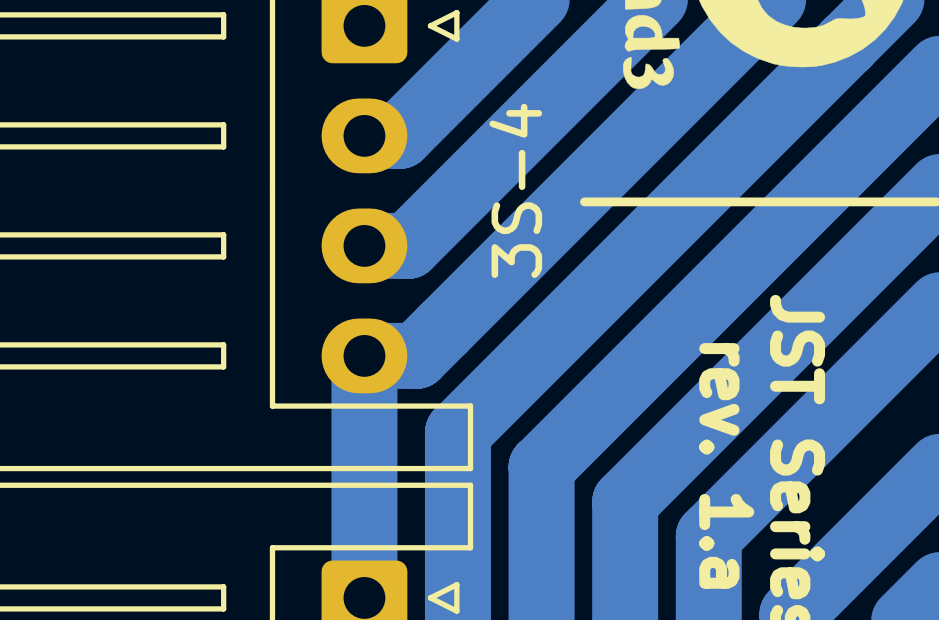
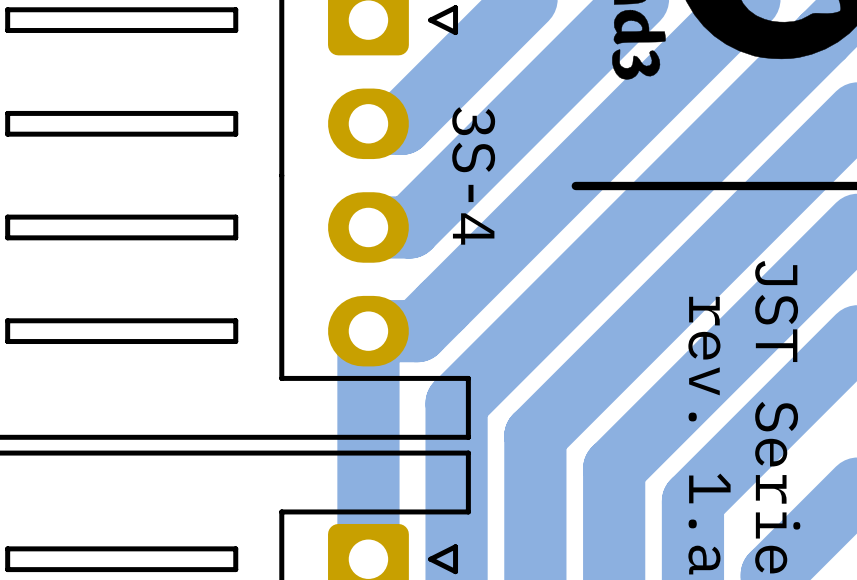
3S-4 name rotation: 0° (515, 190) -> 180° (473, 175)

